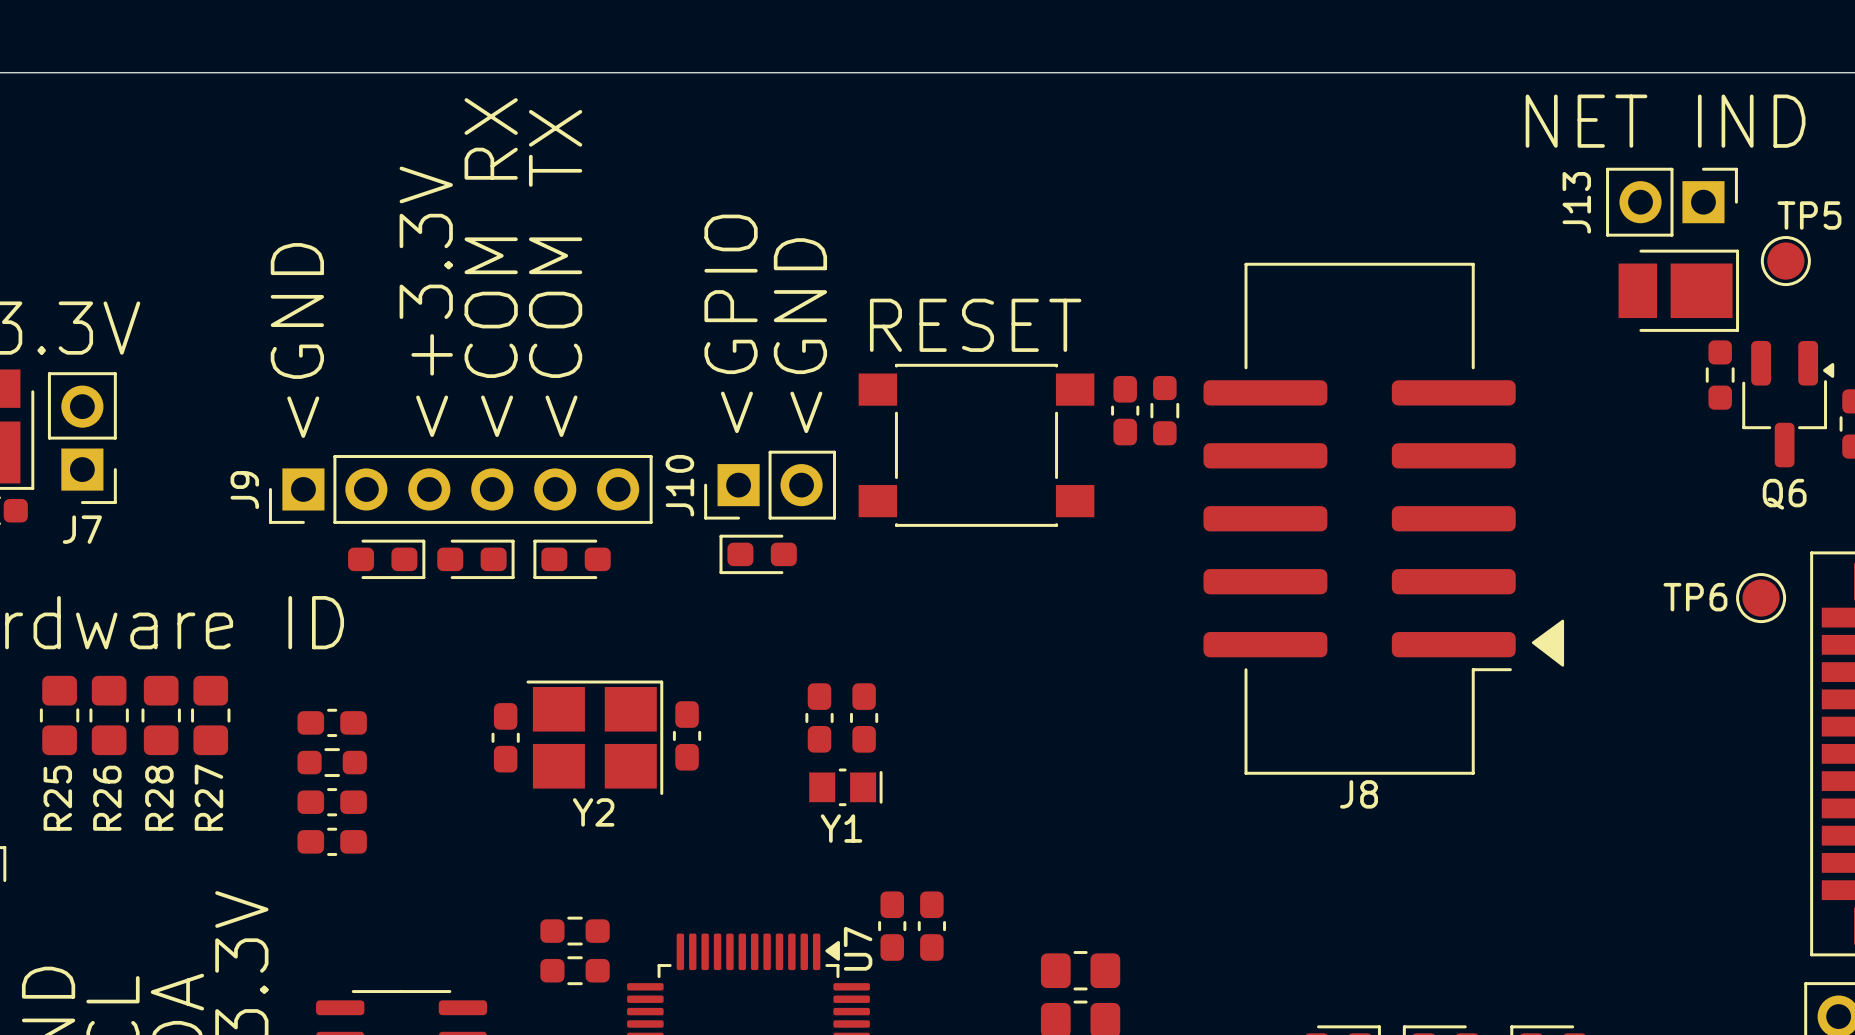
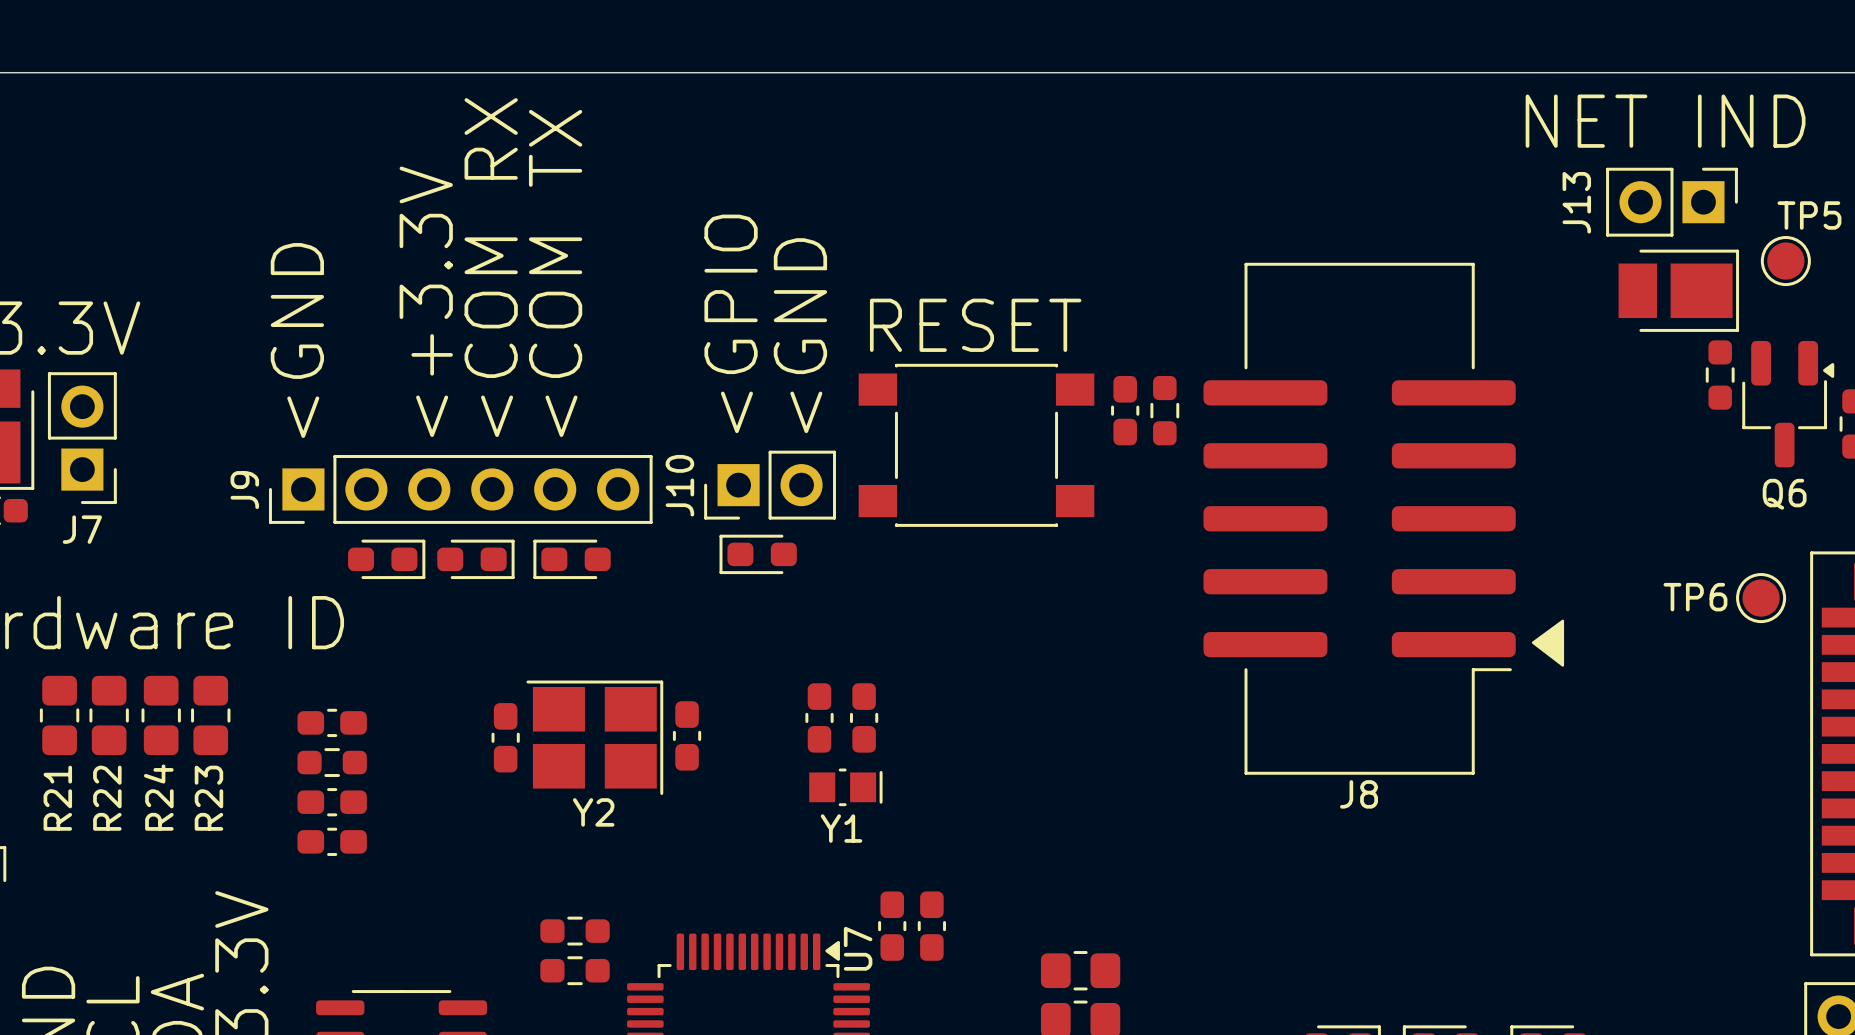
R27 name: R27 (208, 797) -> R23 (208, 798)
R25 name: R25 (57, 798) -> R21 (57, 798)
R26 name: R26 (107, 798) -> R22 (107, 798)
R28 name: R28 (159, 798) -> R24 (158, 797)

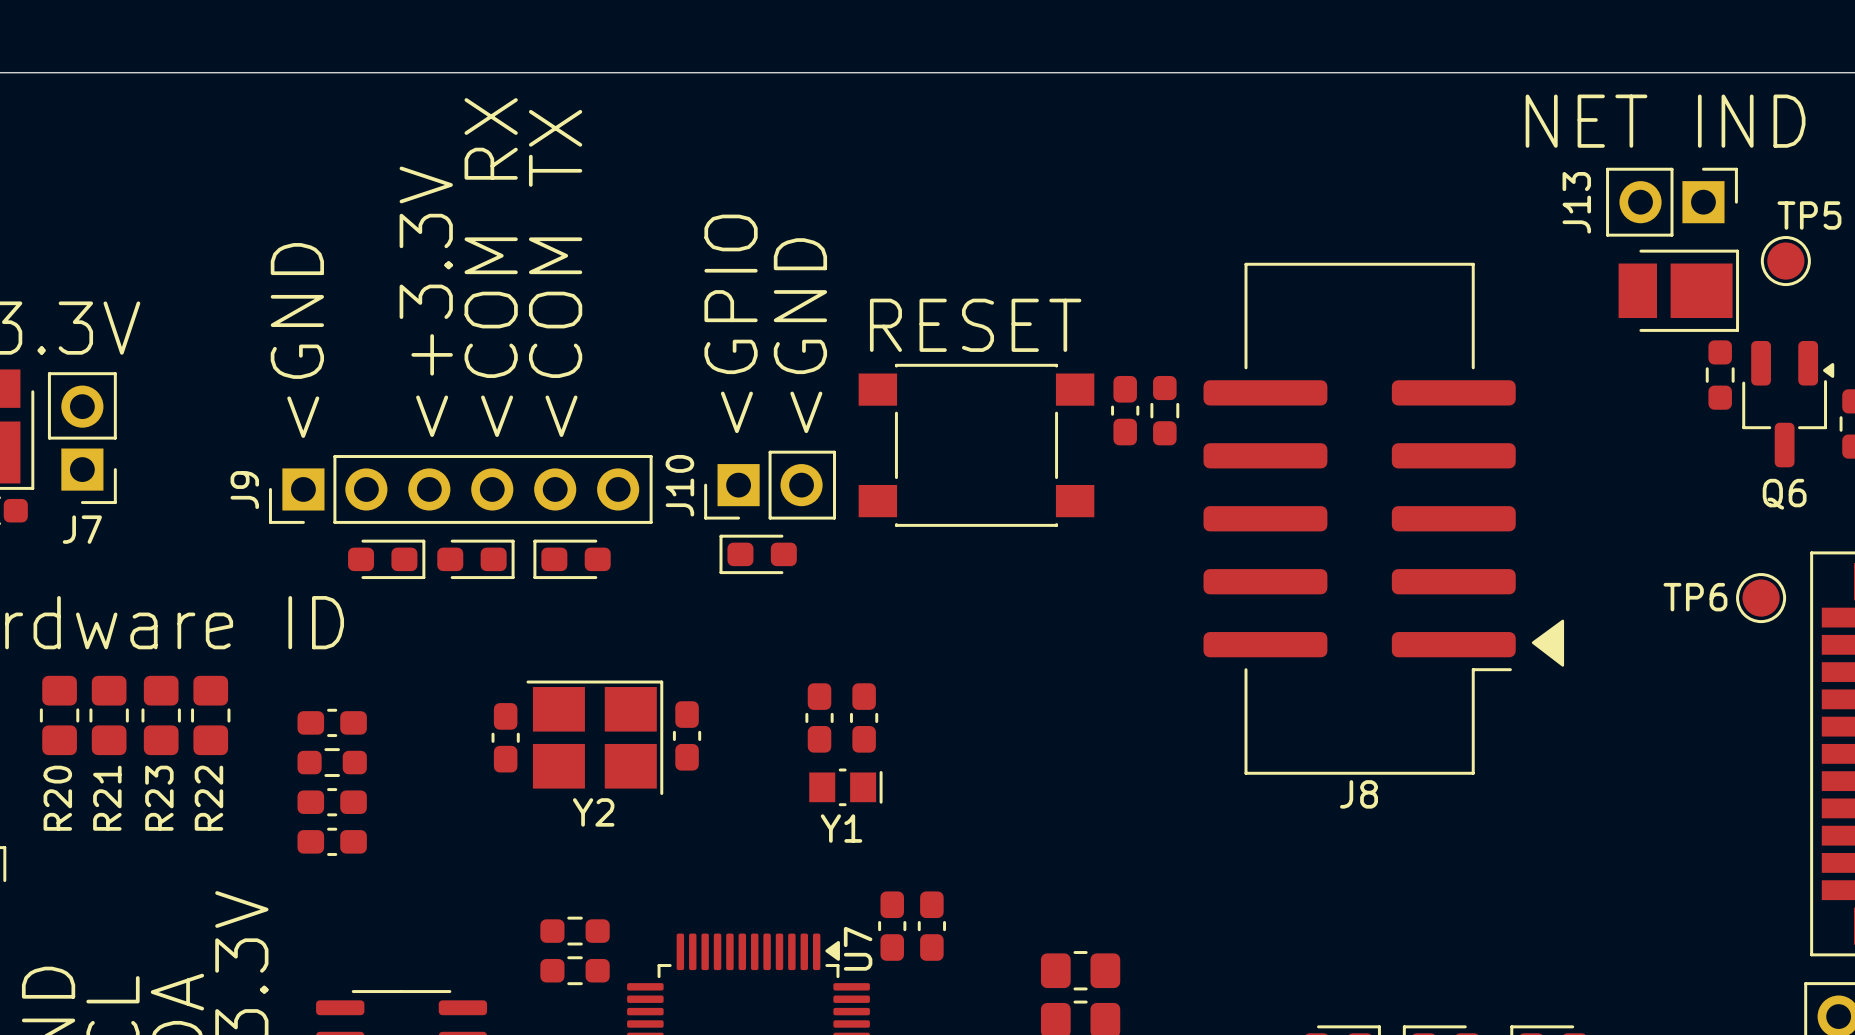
R24 name: R24 (158, 797) -> R23 (159, 798)
R21 name: R21 (57, 798) -> R20 (57, 798)
R22 name: R22 (107, 798) -> R21 (107, 798)
R23 name: R23 (208, 798) -> R22 (208, 798)

